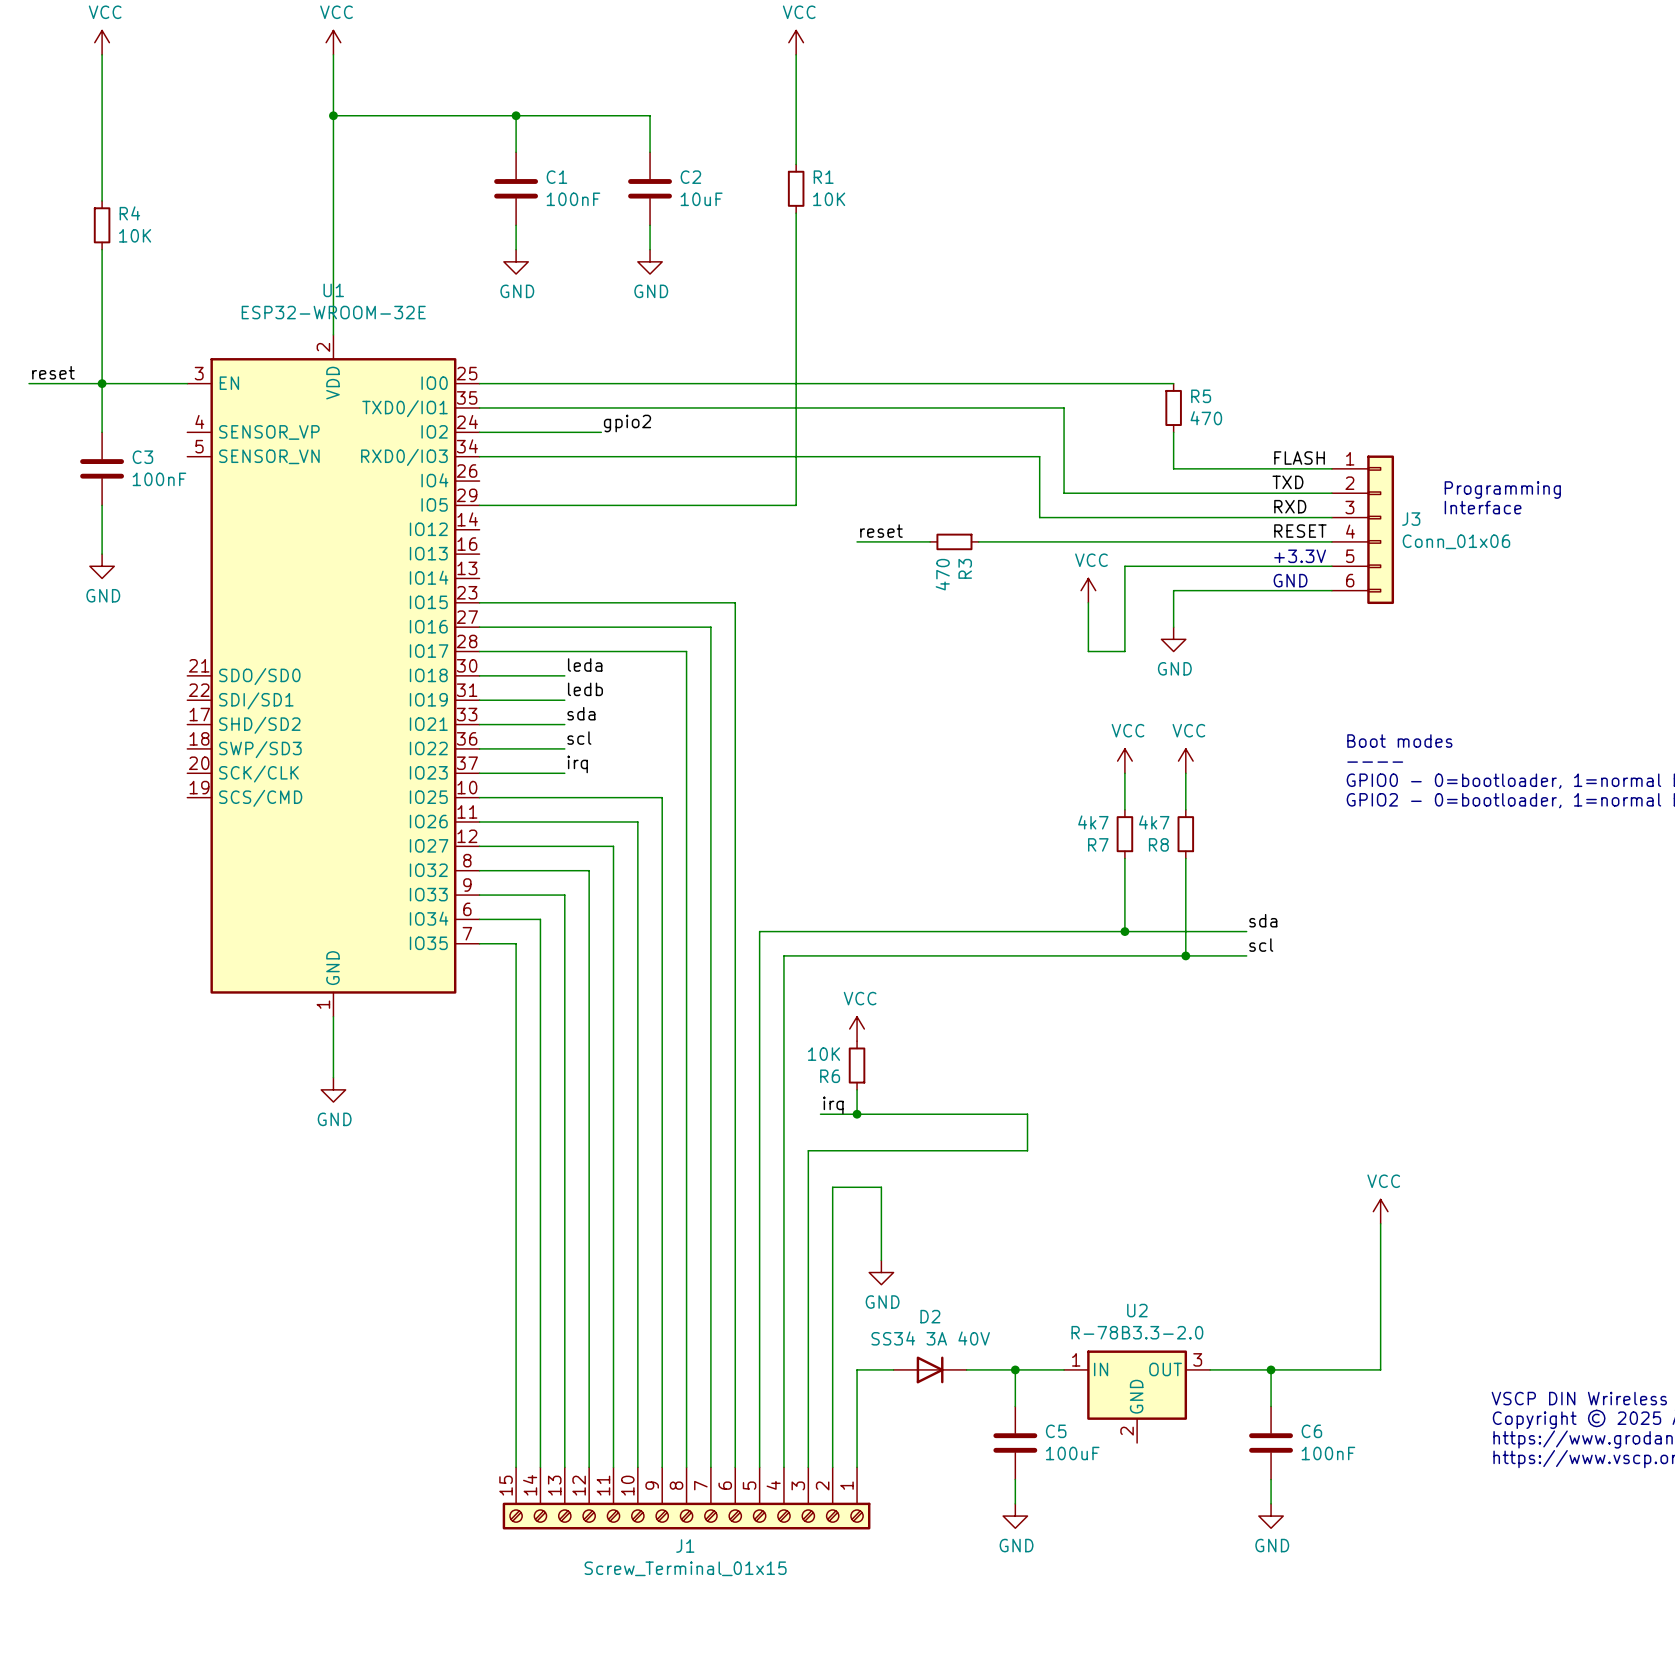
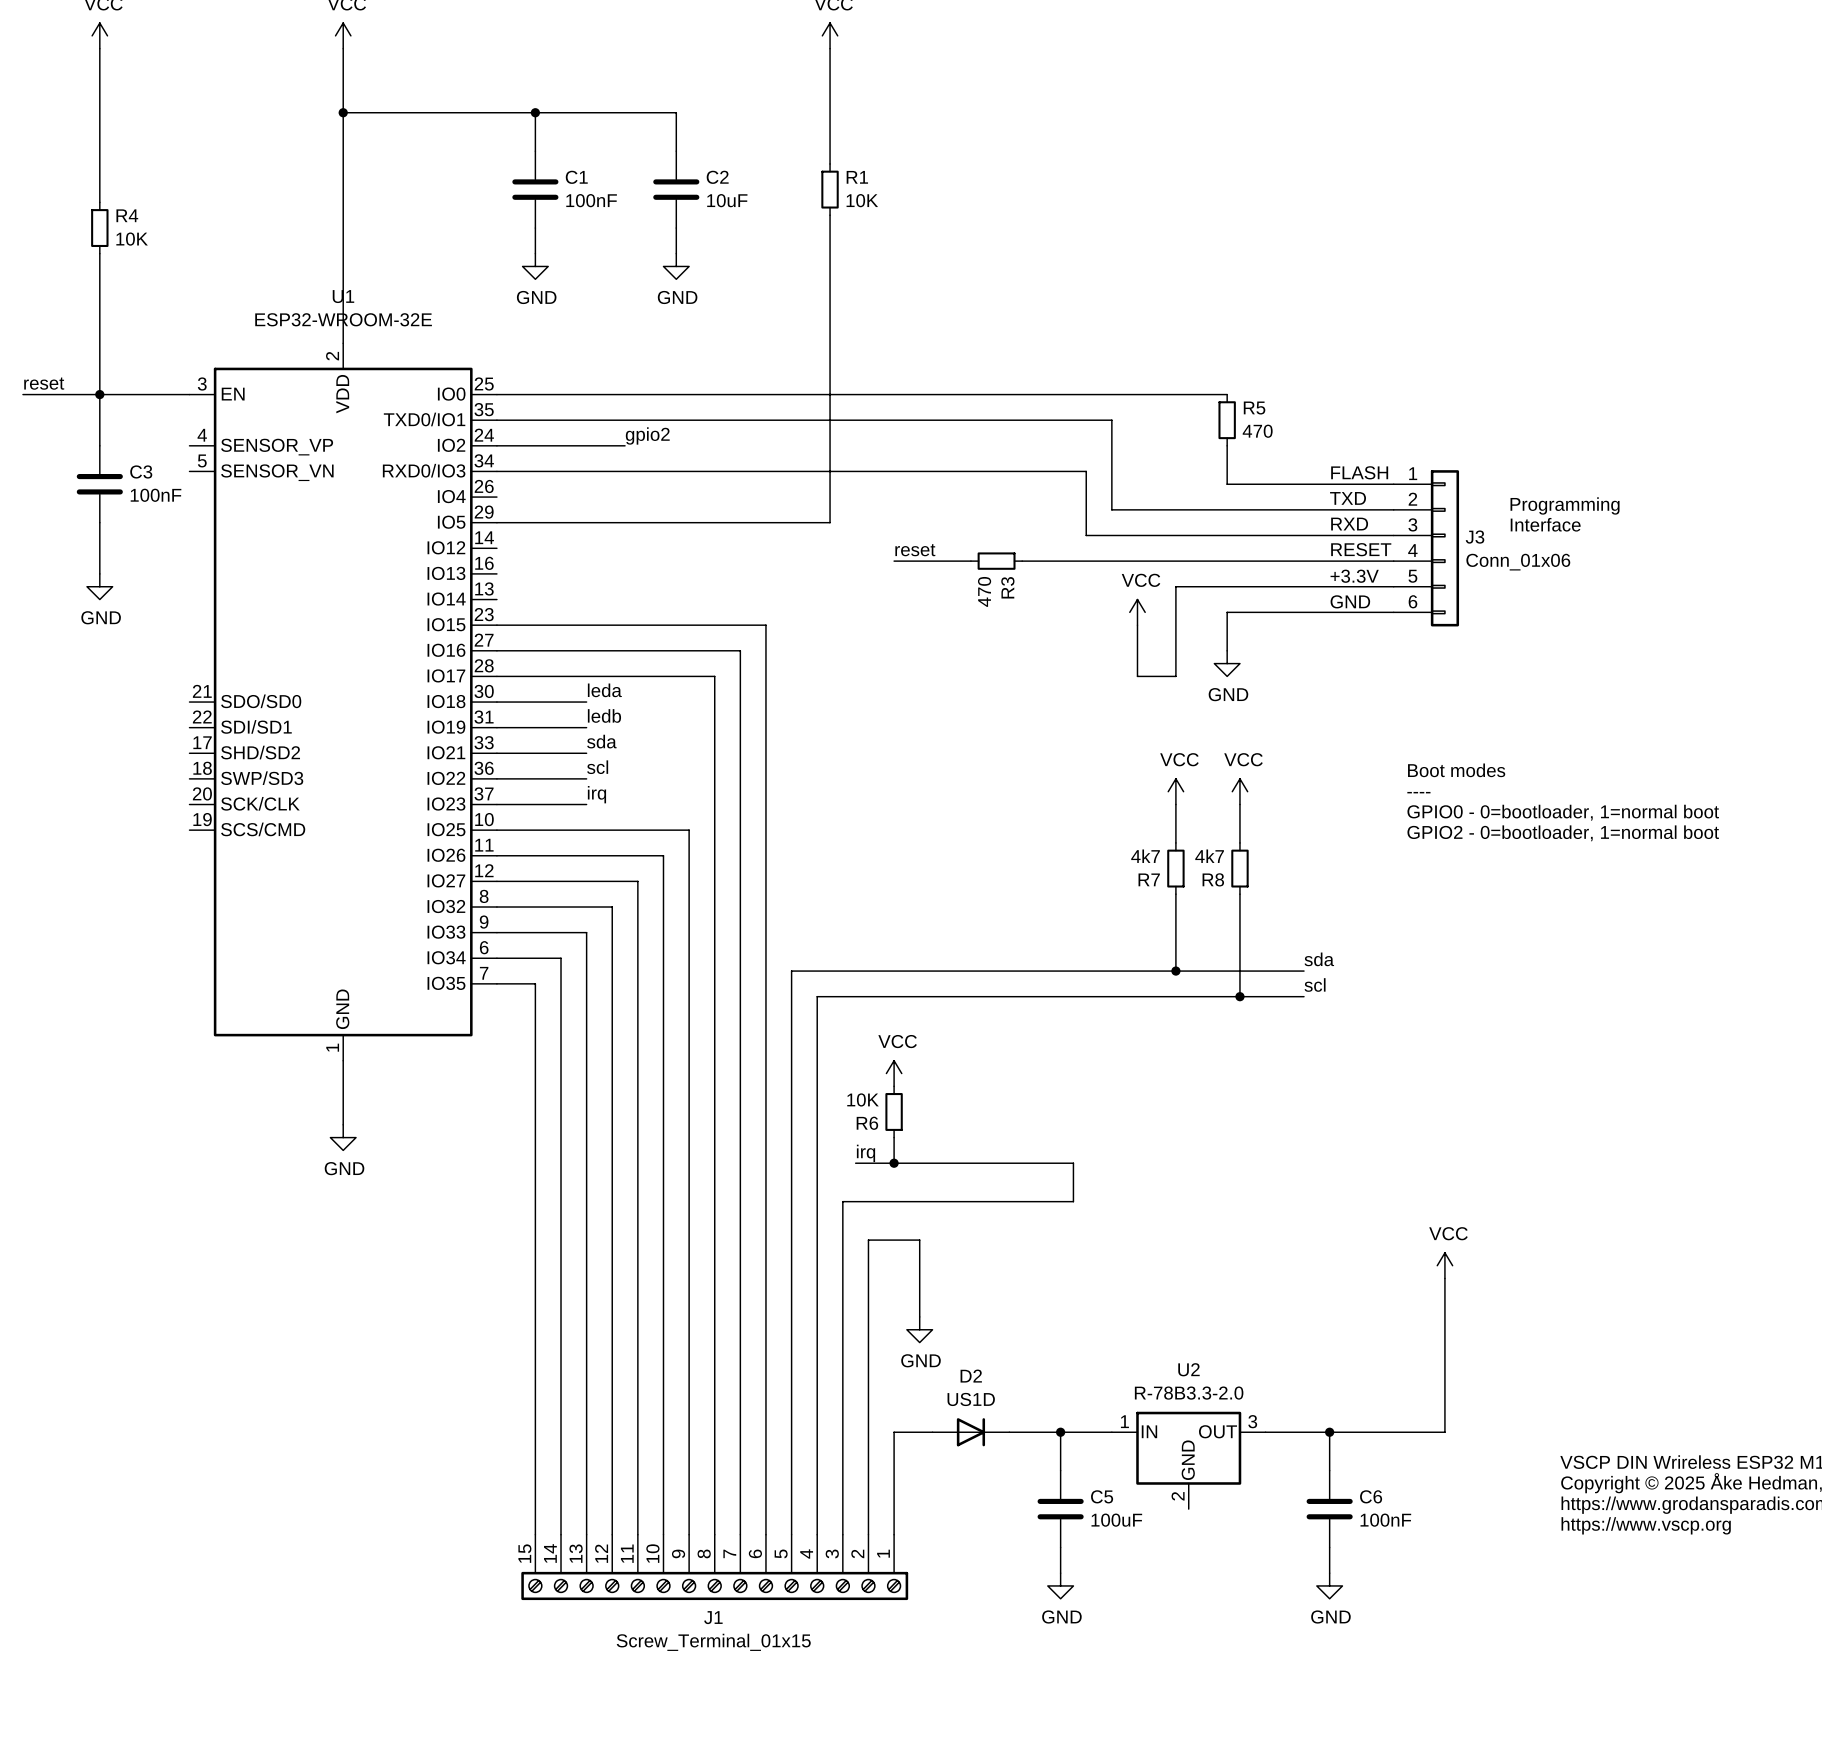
D2 value: SS34 3A 40V (930, 1338) -> US1D (971, 1399)

